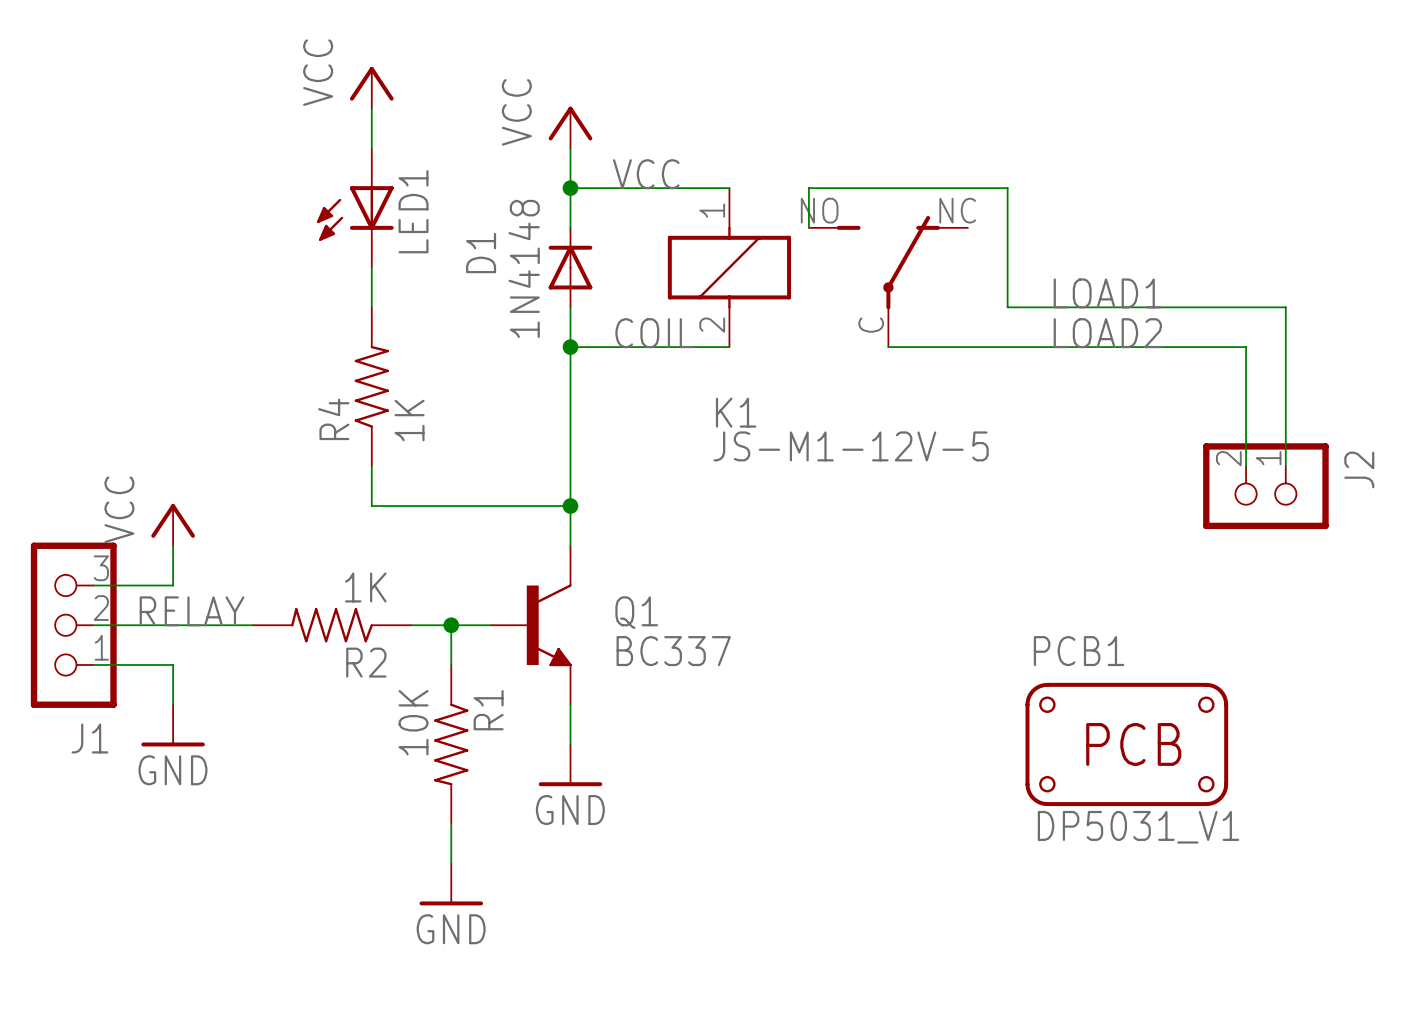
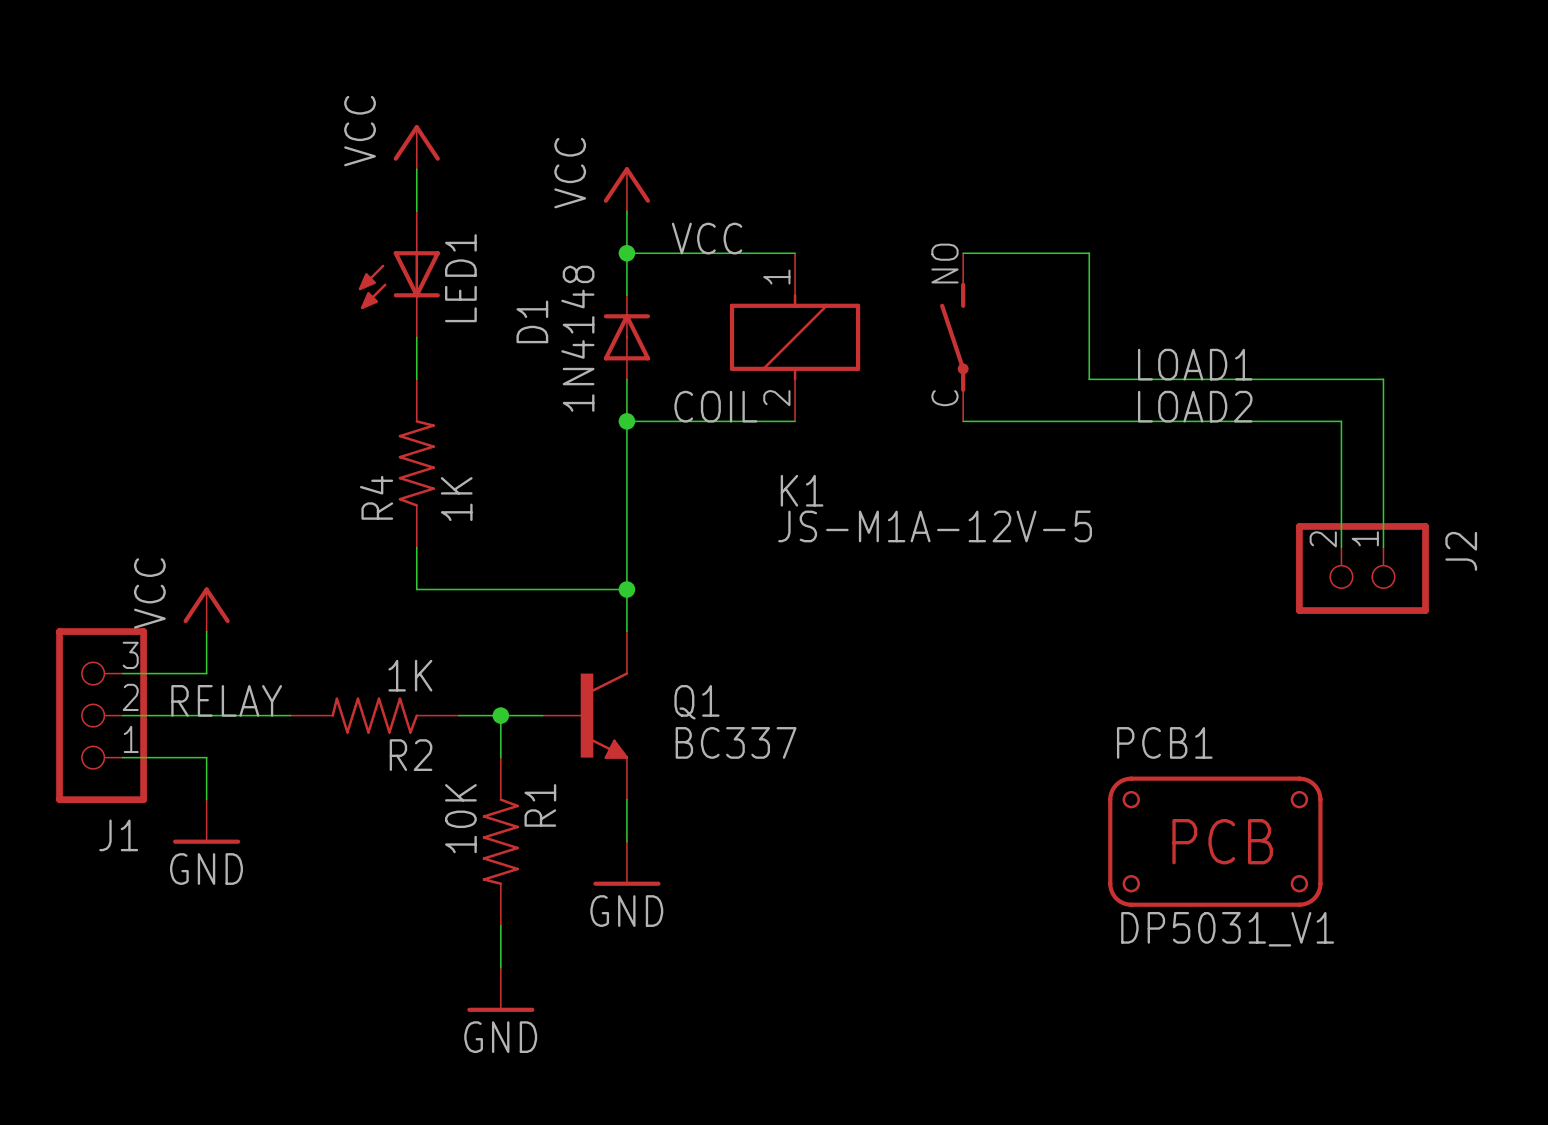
wire: (888, 188) (808, 188) (808, 227) -> none
part: none -> (954, 337)
part: (888, 281) -> none
K1 value: JS-M1-12V-5 (851, 446) -> JS-M1A-12V-5 (935, 526)

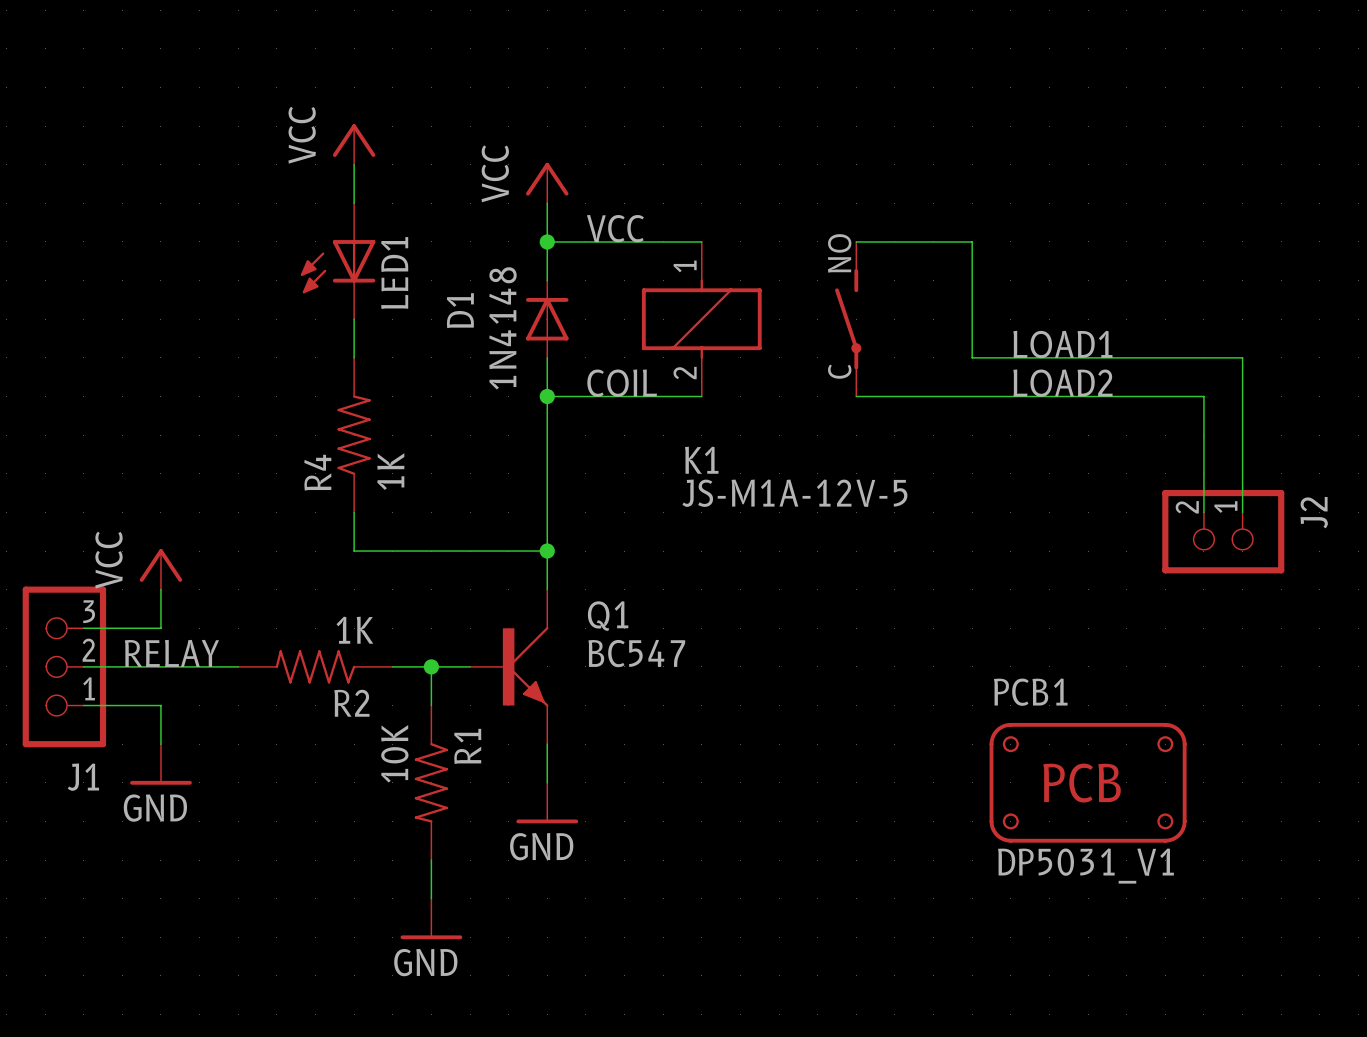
Q1 symbol: [542, 631, 629, 800] -> [470, 589, 549, 745]
Q1 name position: Q1 (696, 702) -> Q1 (608, 616)
Q1 value: BC337 (736, 742) -> BC547 (636, 653)

